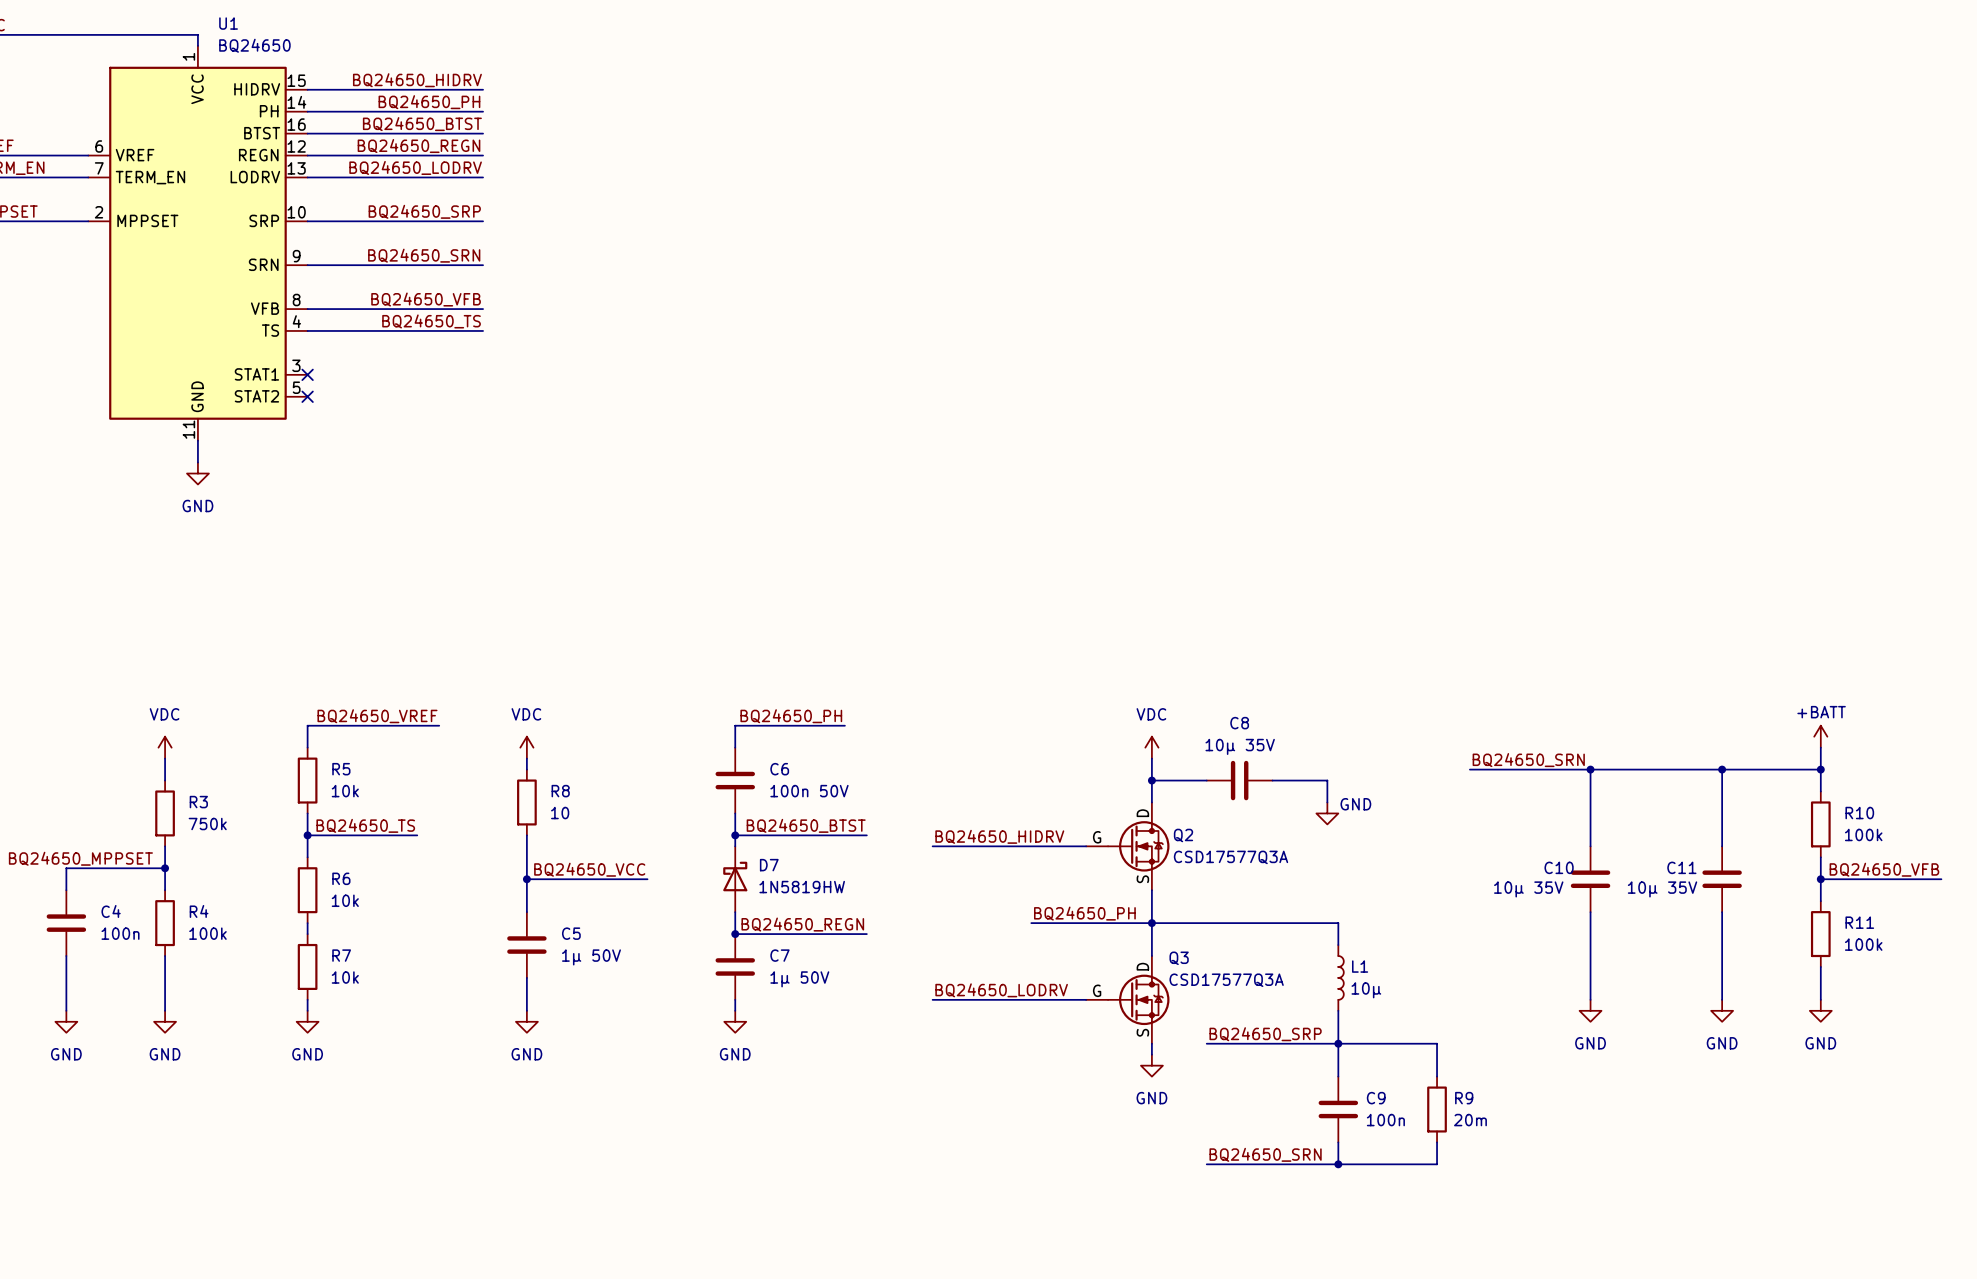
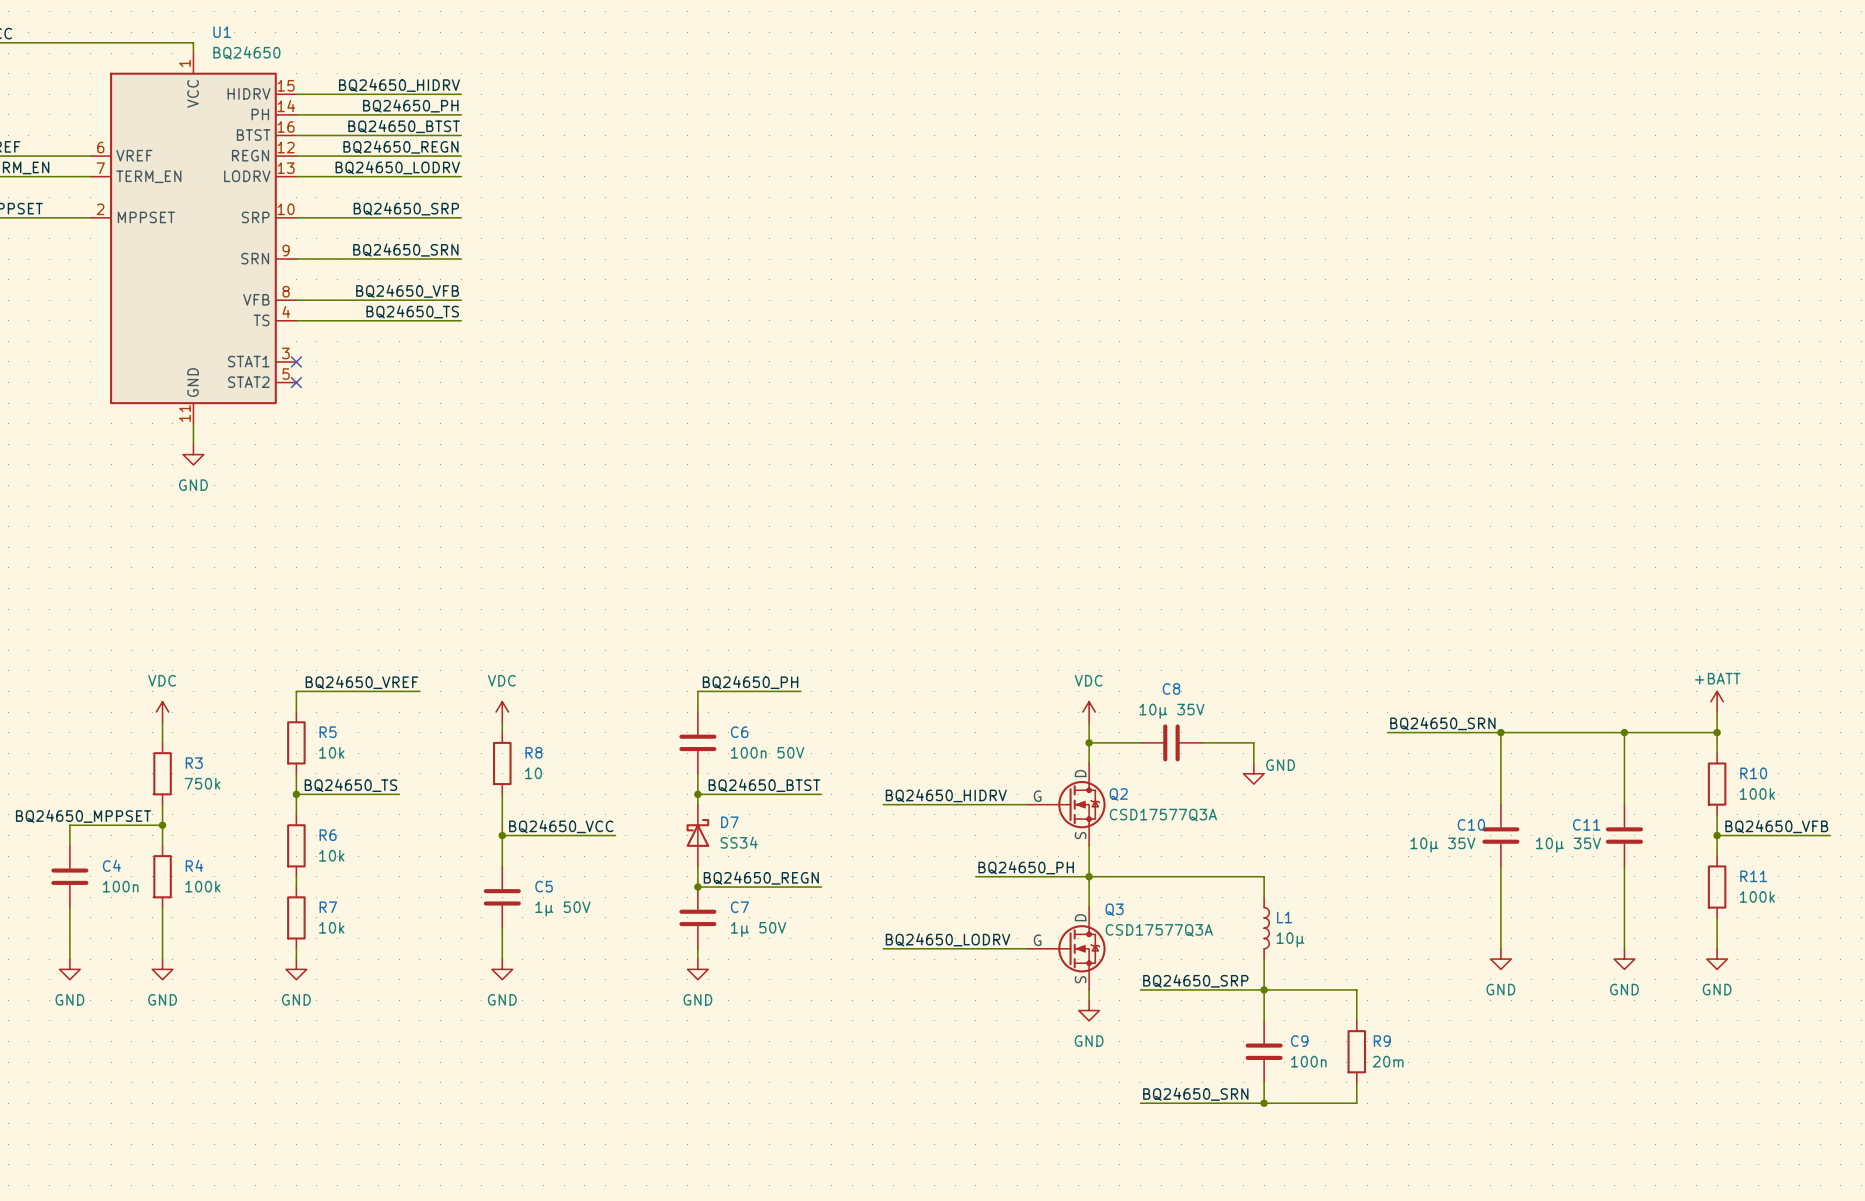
D7 value: 1N5819HW (802, 887) -> SS34 (739, 842)

